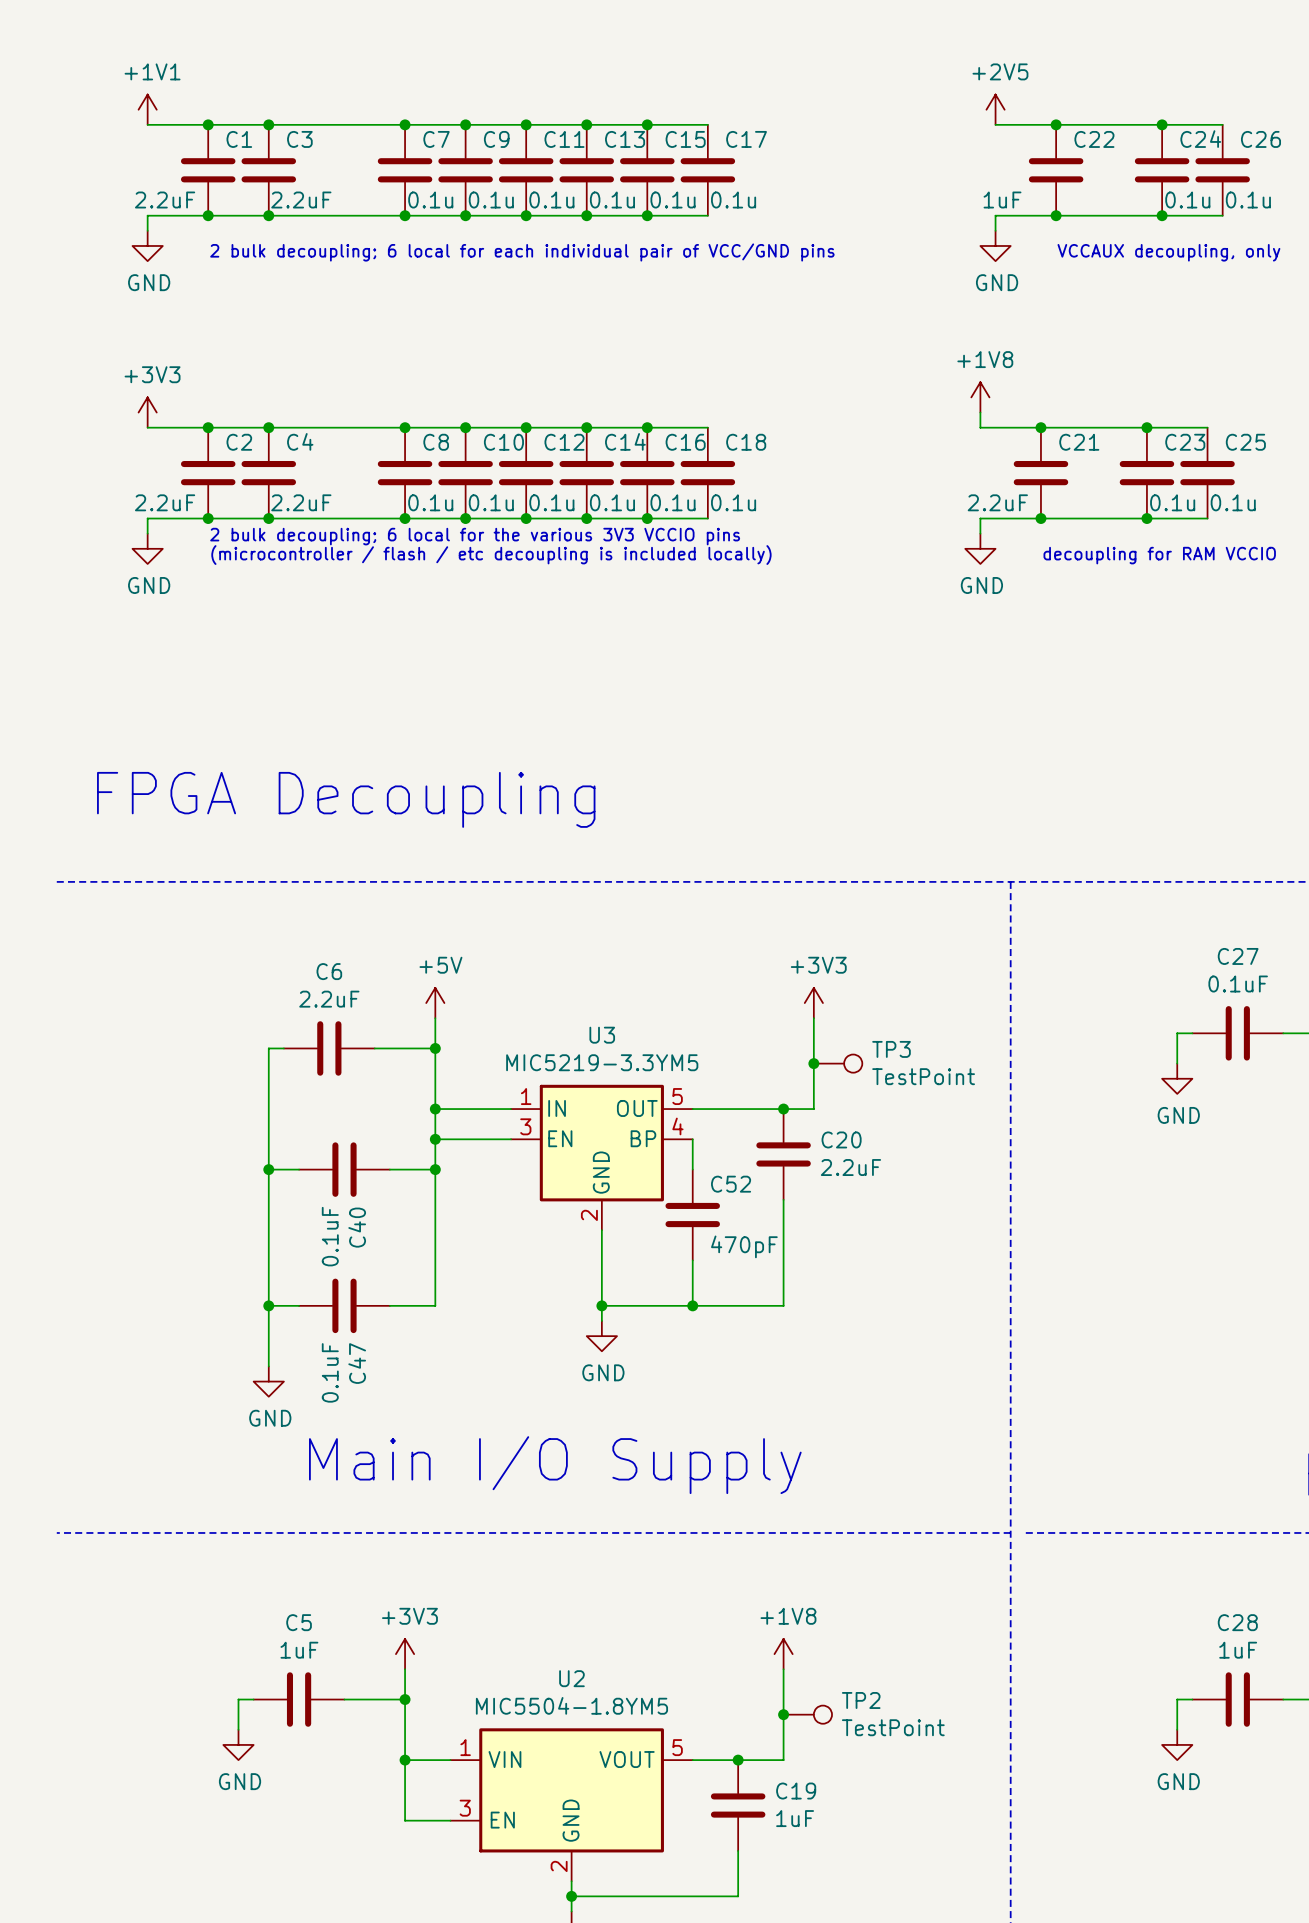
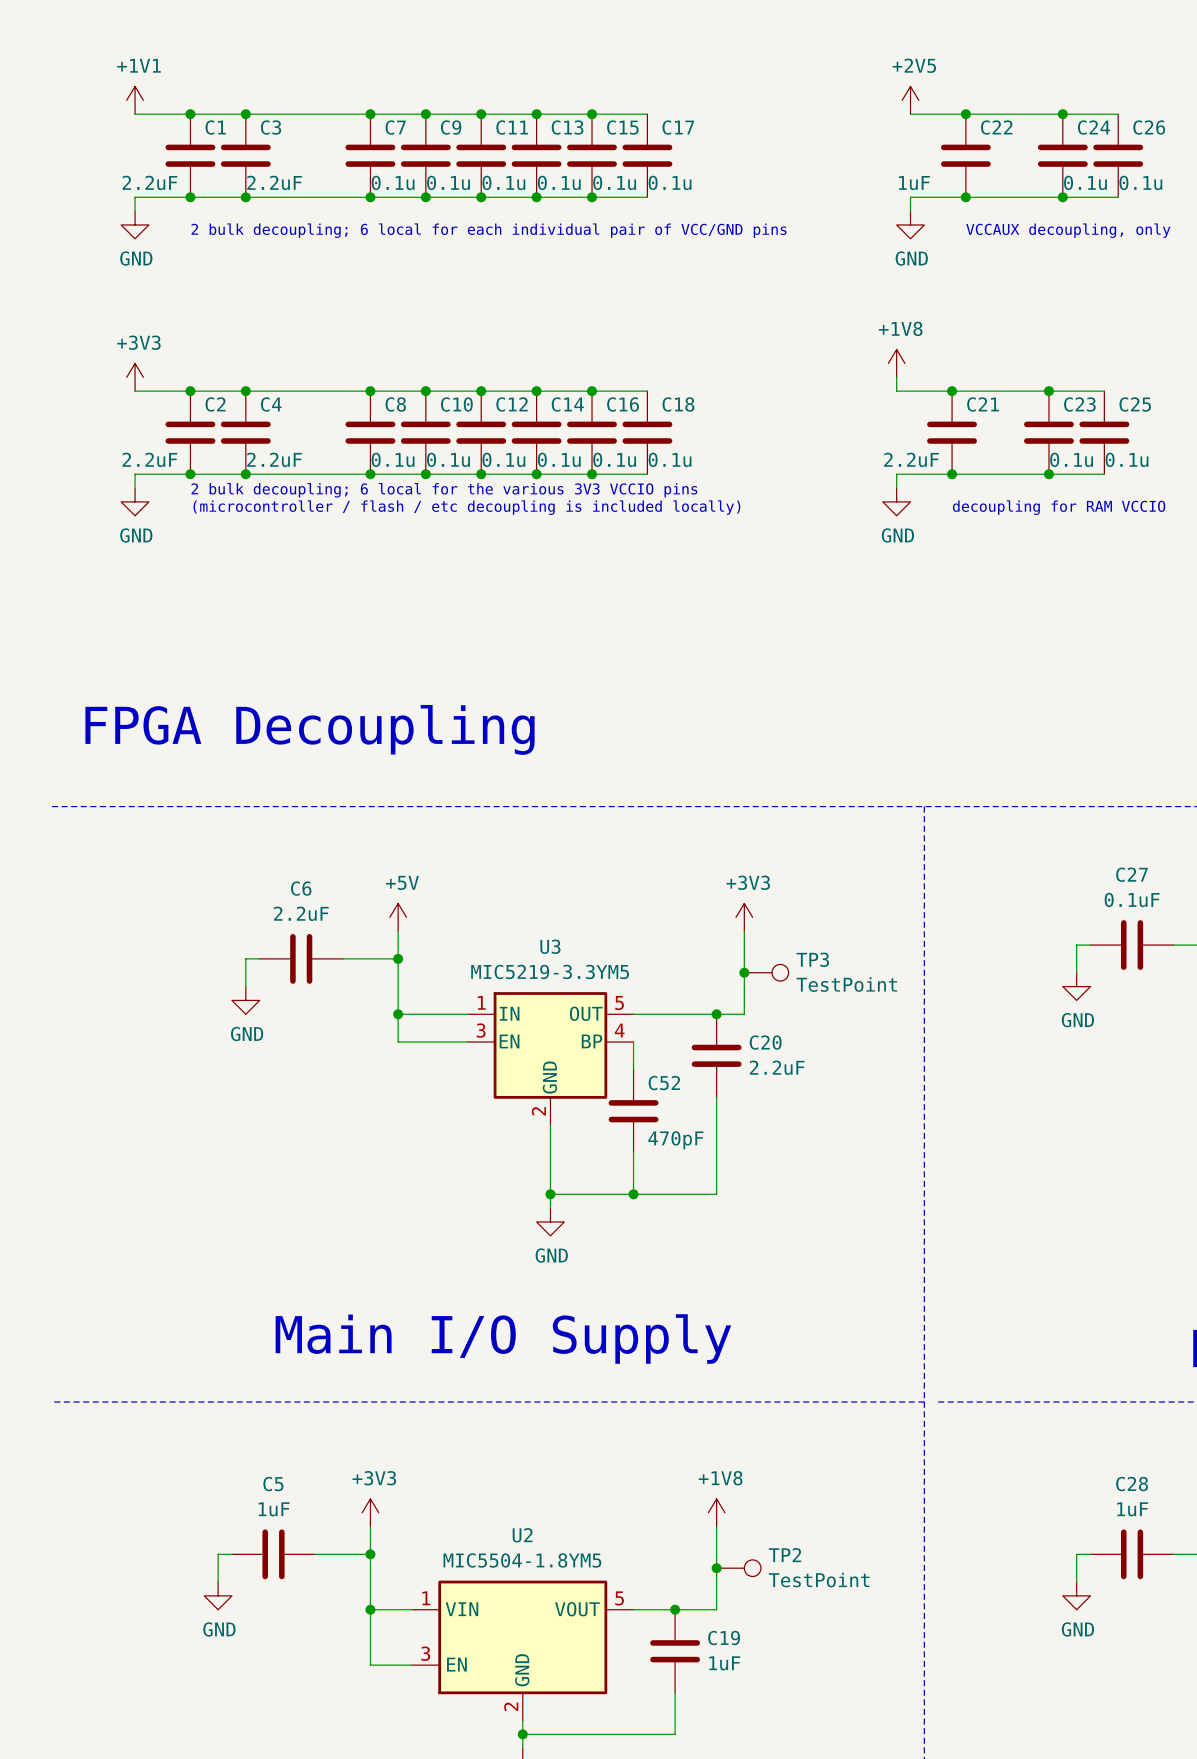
wire: (268, 1078) (268, 1366) -> none
wire: (435, 1139) (435, 1305) (389, 1305) -> none
junction: (435, 1139) -> none
wire: (268, 1169) (299, 1169) -> none
junction: (268, 1169) -> none
C40: 0.1uF (344, 1169) -> none
wire: (389, 1169) (435, 1169) -> none
junction: (435, 1169) -> none
wire: (268, 1305) (299, 1305) -> none
junction: (268, 1305) -> none
C47: 0.1uF (344, 1305) -> none
power symbol position: GND (268, 1381) -> GND (245, 1000)

